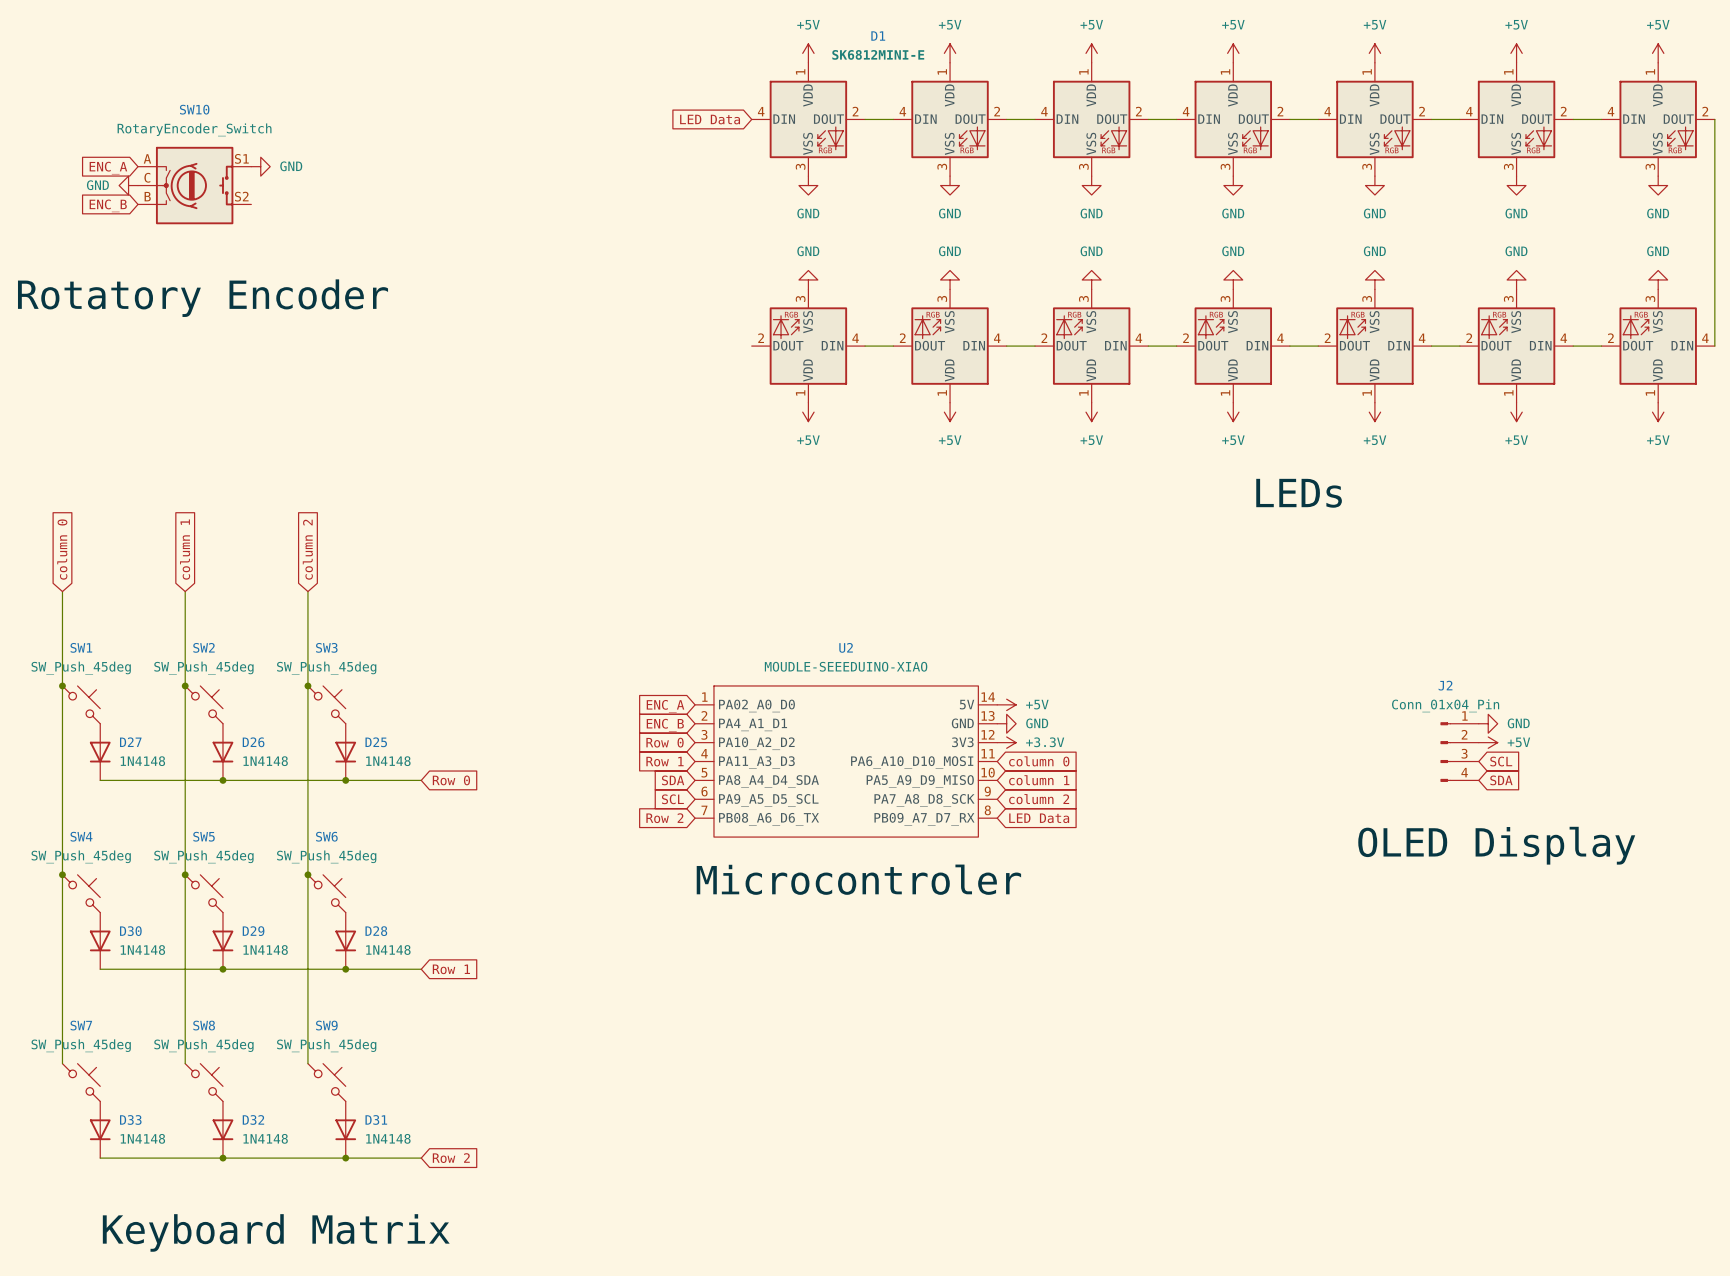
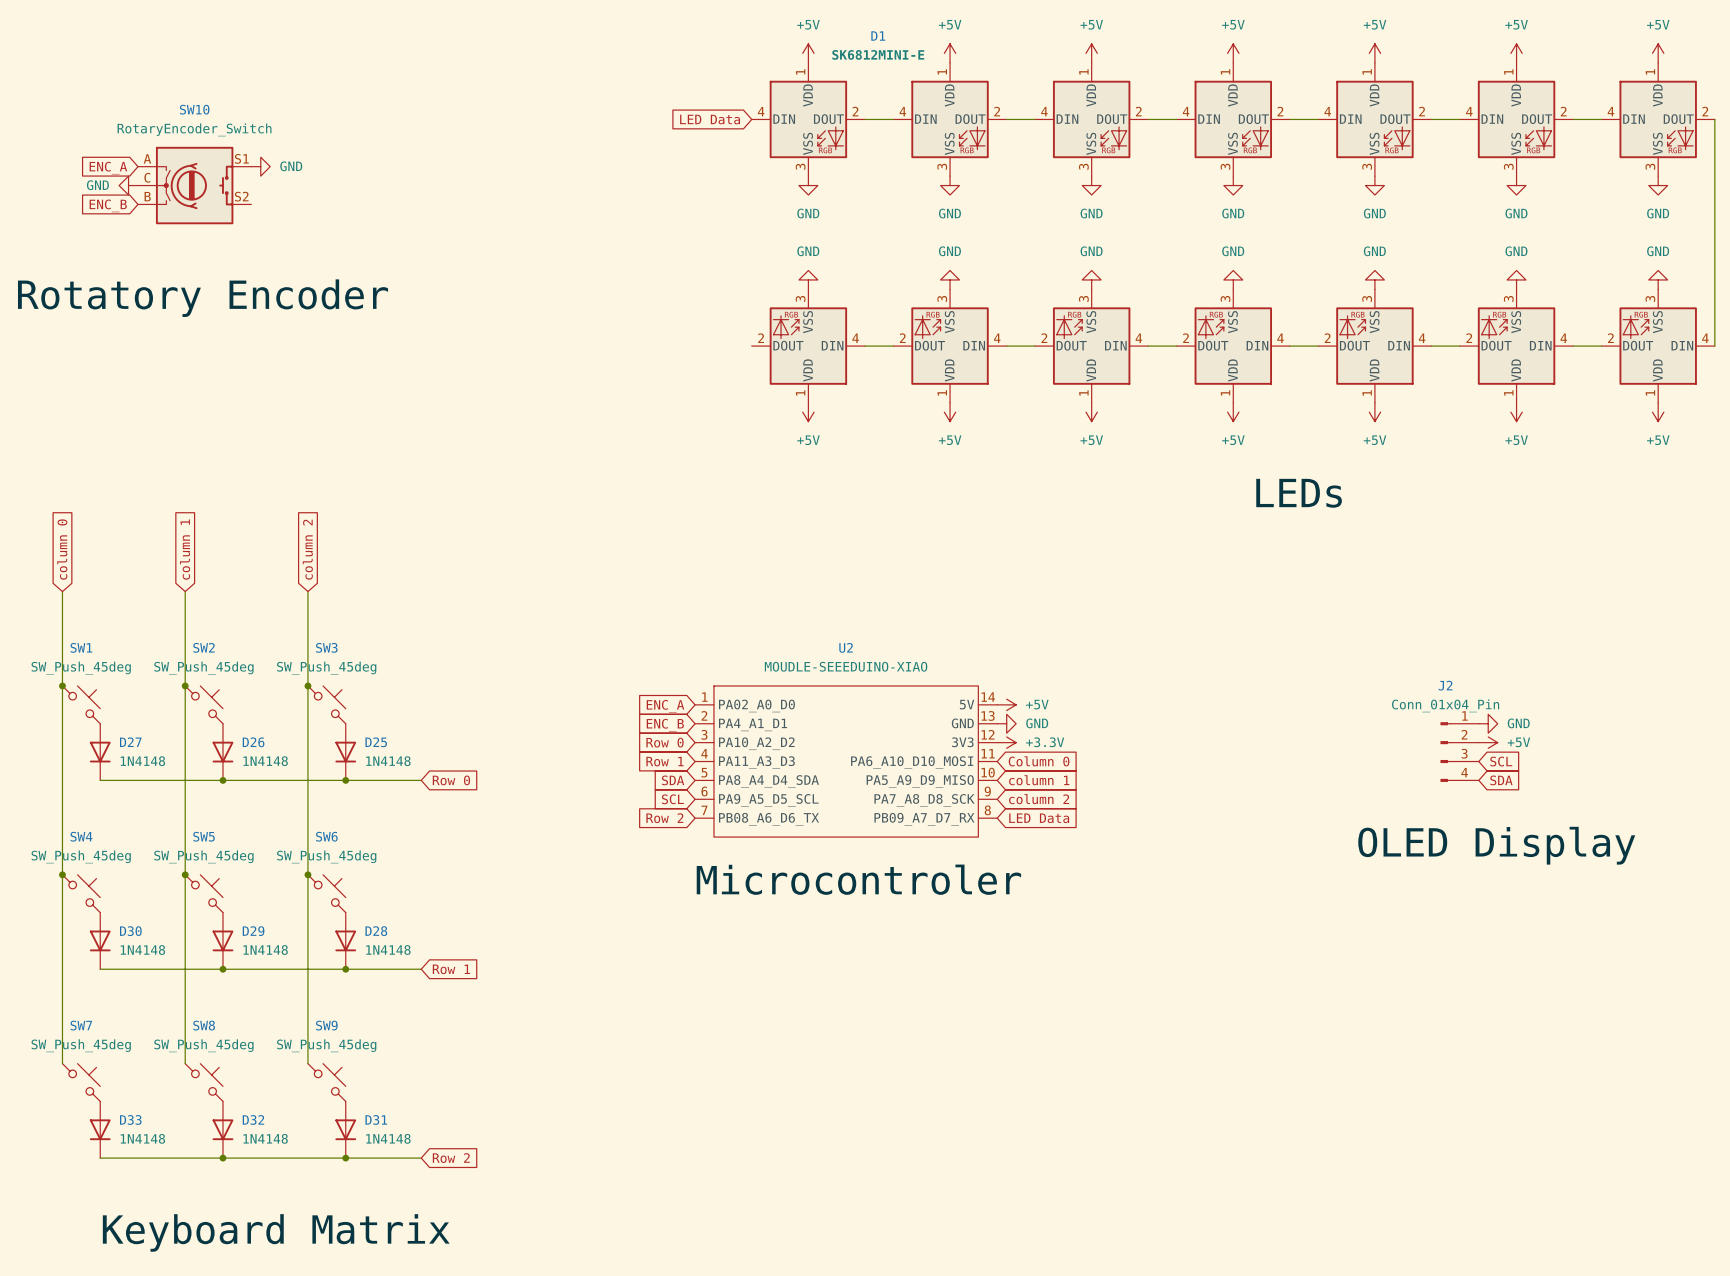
global label: column 0 (1039, 761) -> Column 0 (1039, 761)

